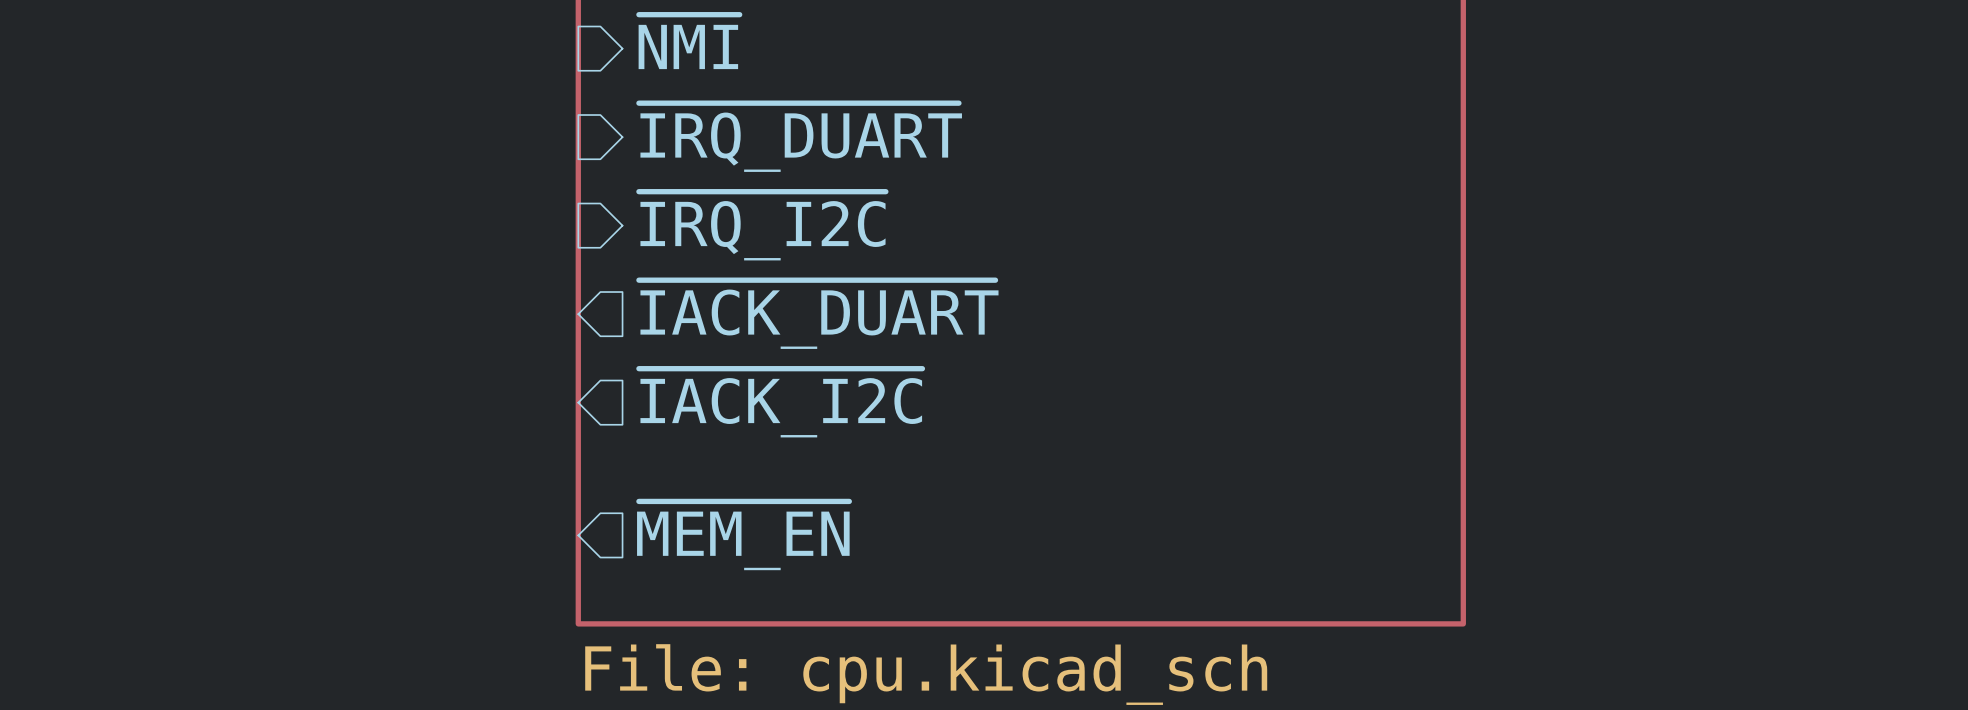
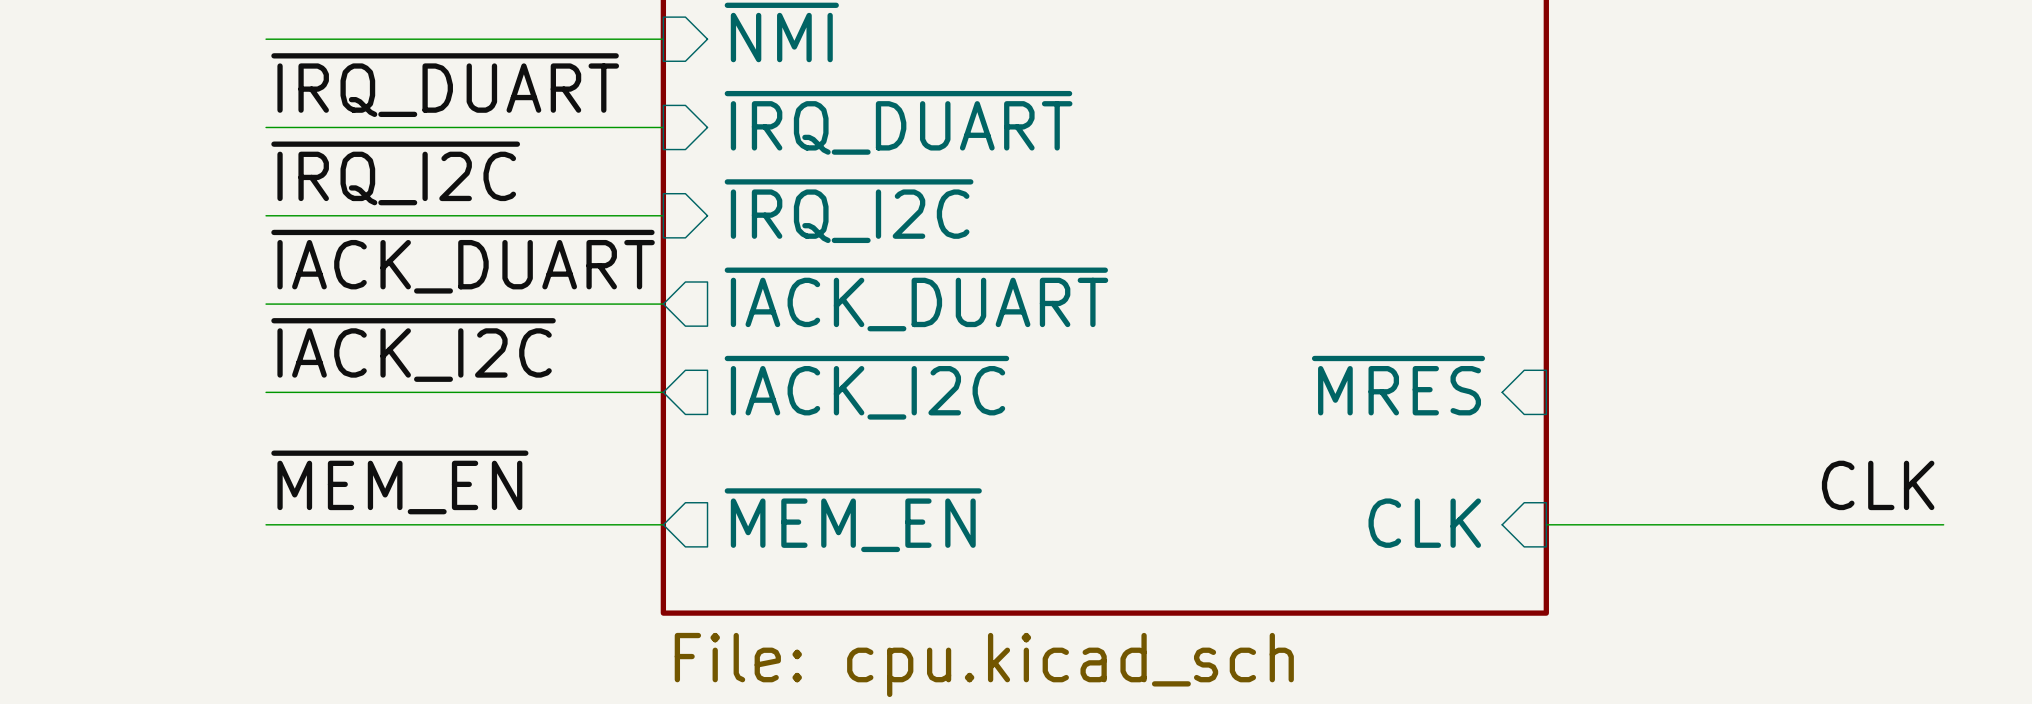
wire: none -> (266, 39) (663, 39)
label: none -> ~{IRQ_DUART} (445, 85)
wire: none -> (266, 127) (663, 127)
label: none -> ~{IRQ_I2C} (395, 173)
wire: none -> (266, 215) (663, 215)
label: none -> ~{IACK_DUART} (463, 261)
wire: none -> (266, 304) (663, 304)
label: none -> ~{IACK_I2C} (413, 349)
sheet pin: none -> ~{MRES} (1398, 385)
wire: none -> (266, 392) (663, 392)
label: none -> CLK (1878, 485)
label: none -> ~{MEM_EN} (399, 482)
sheet pin: none -> CLK (1424, 523)
wire: none -> (266, 524) (663, 524)
wire: none -> (1546, 524) (1943, 524)

